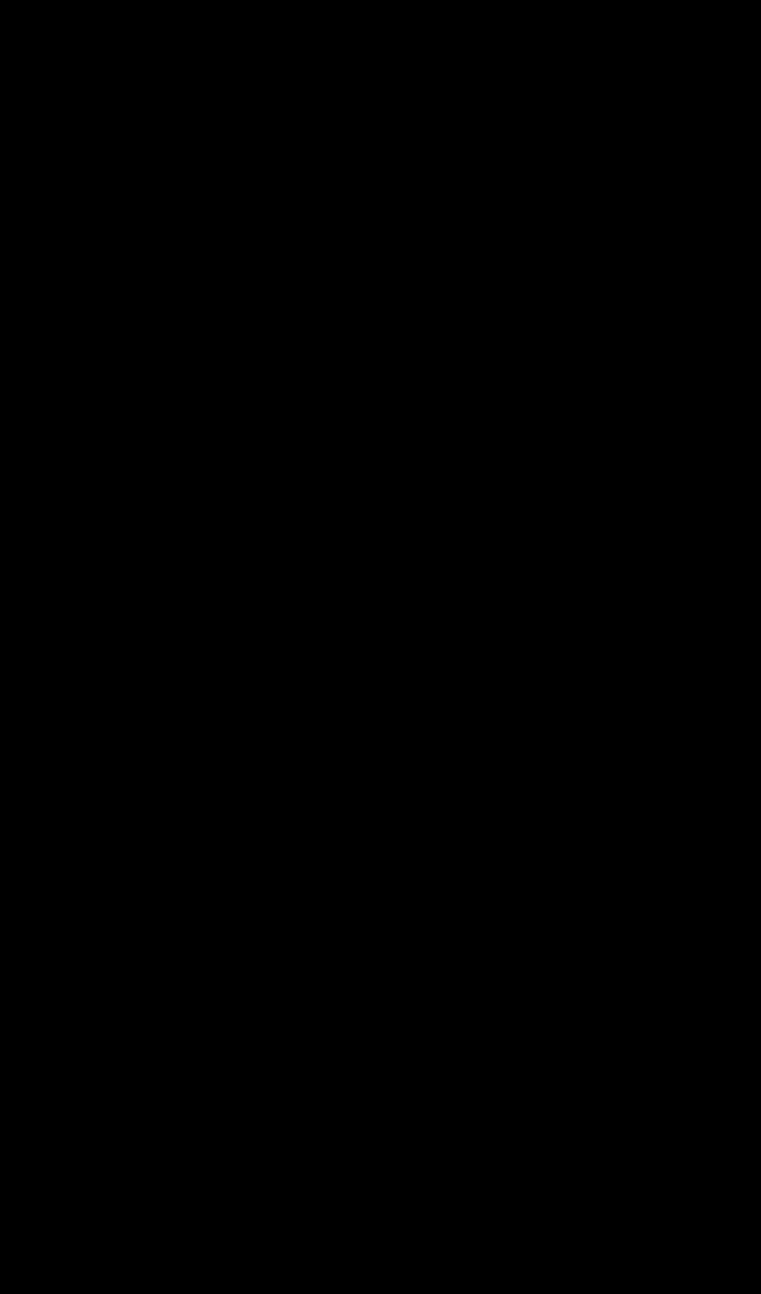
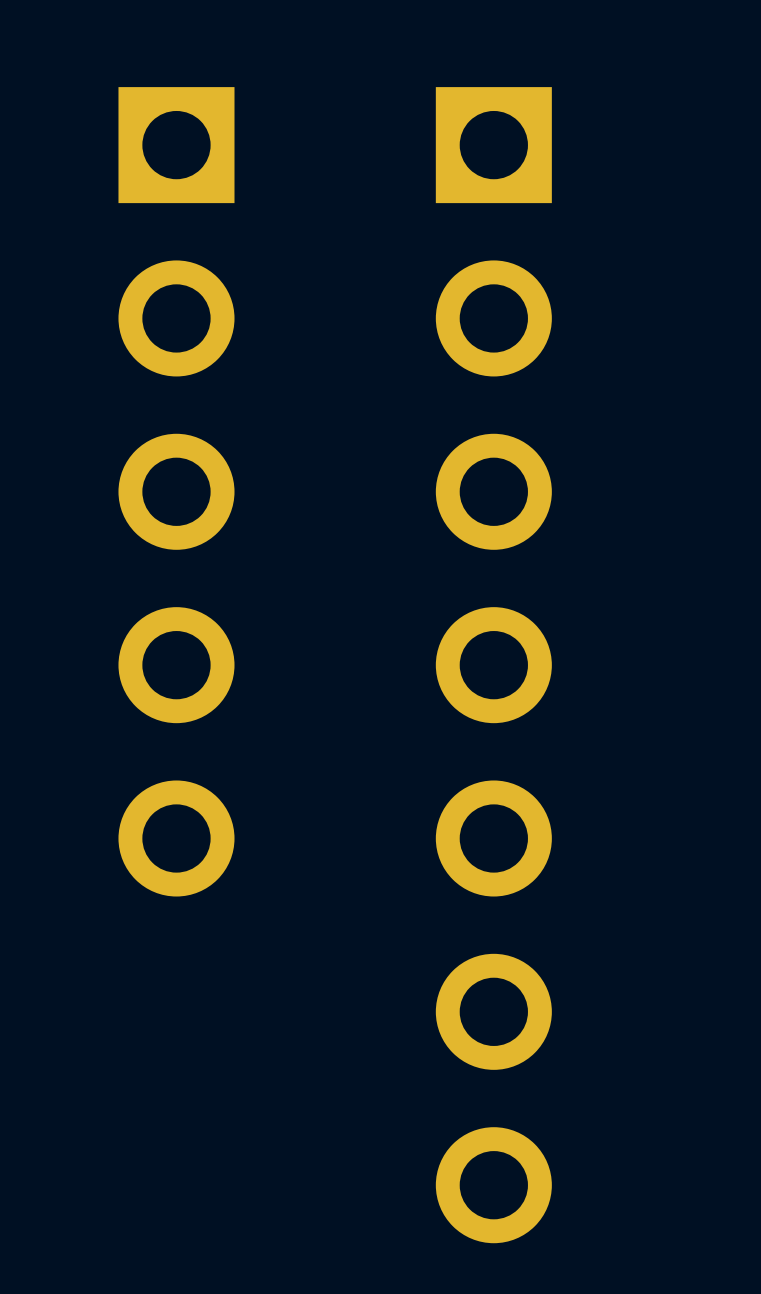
part: none -> (176, 491)
part: none -> (493, 665)

